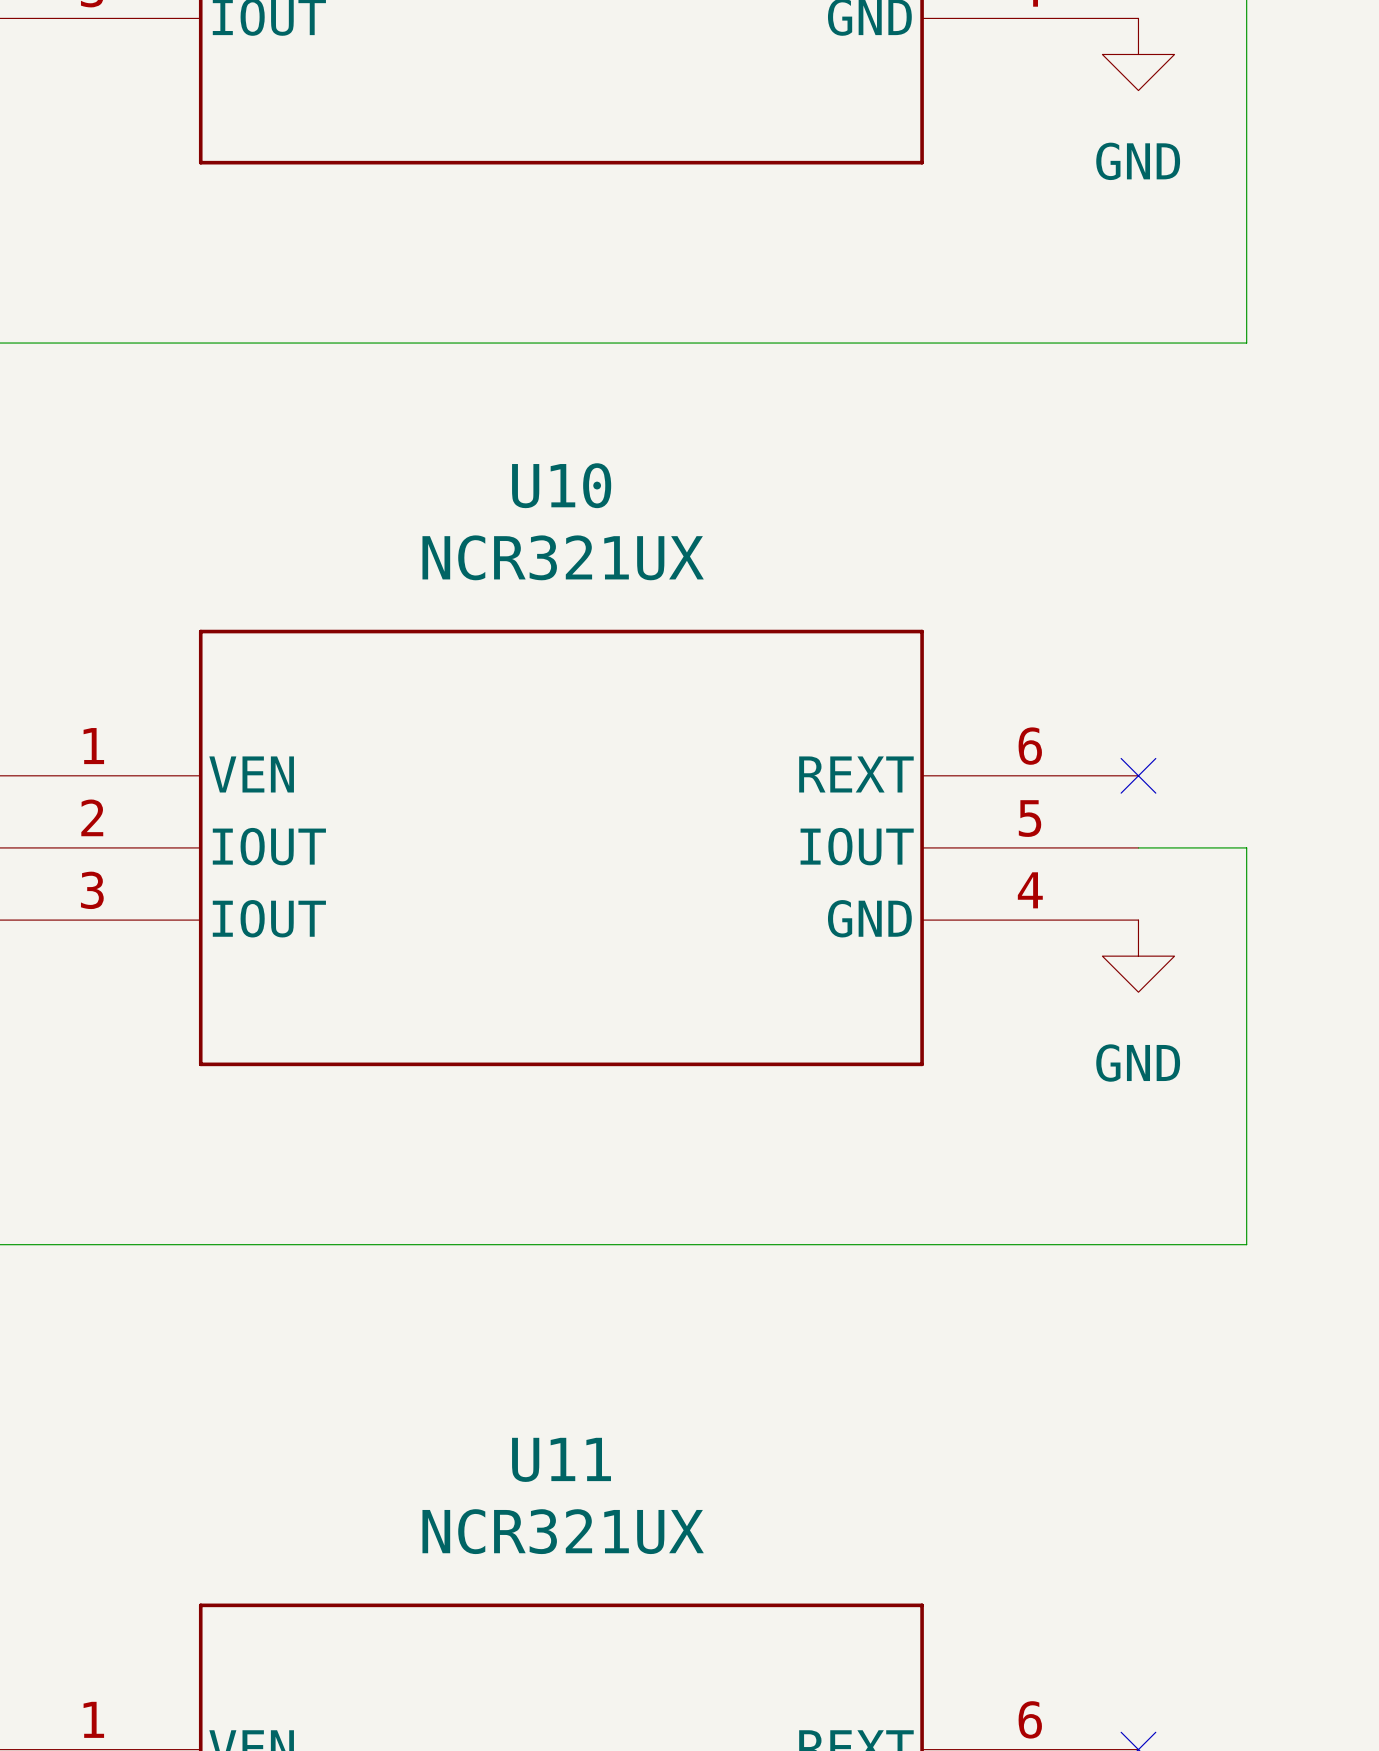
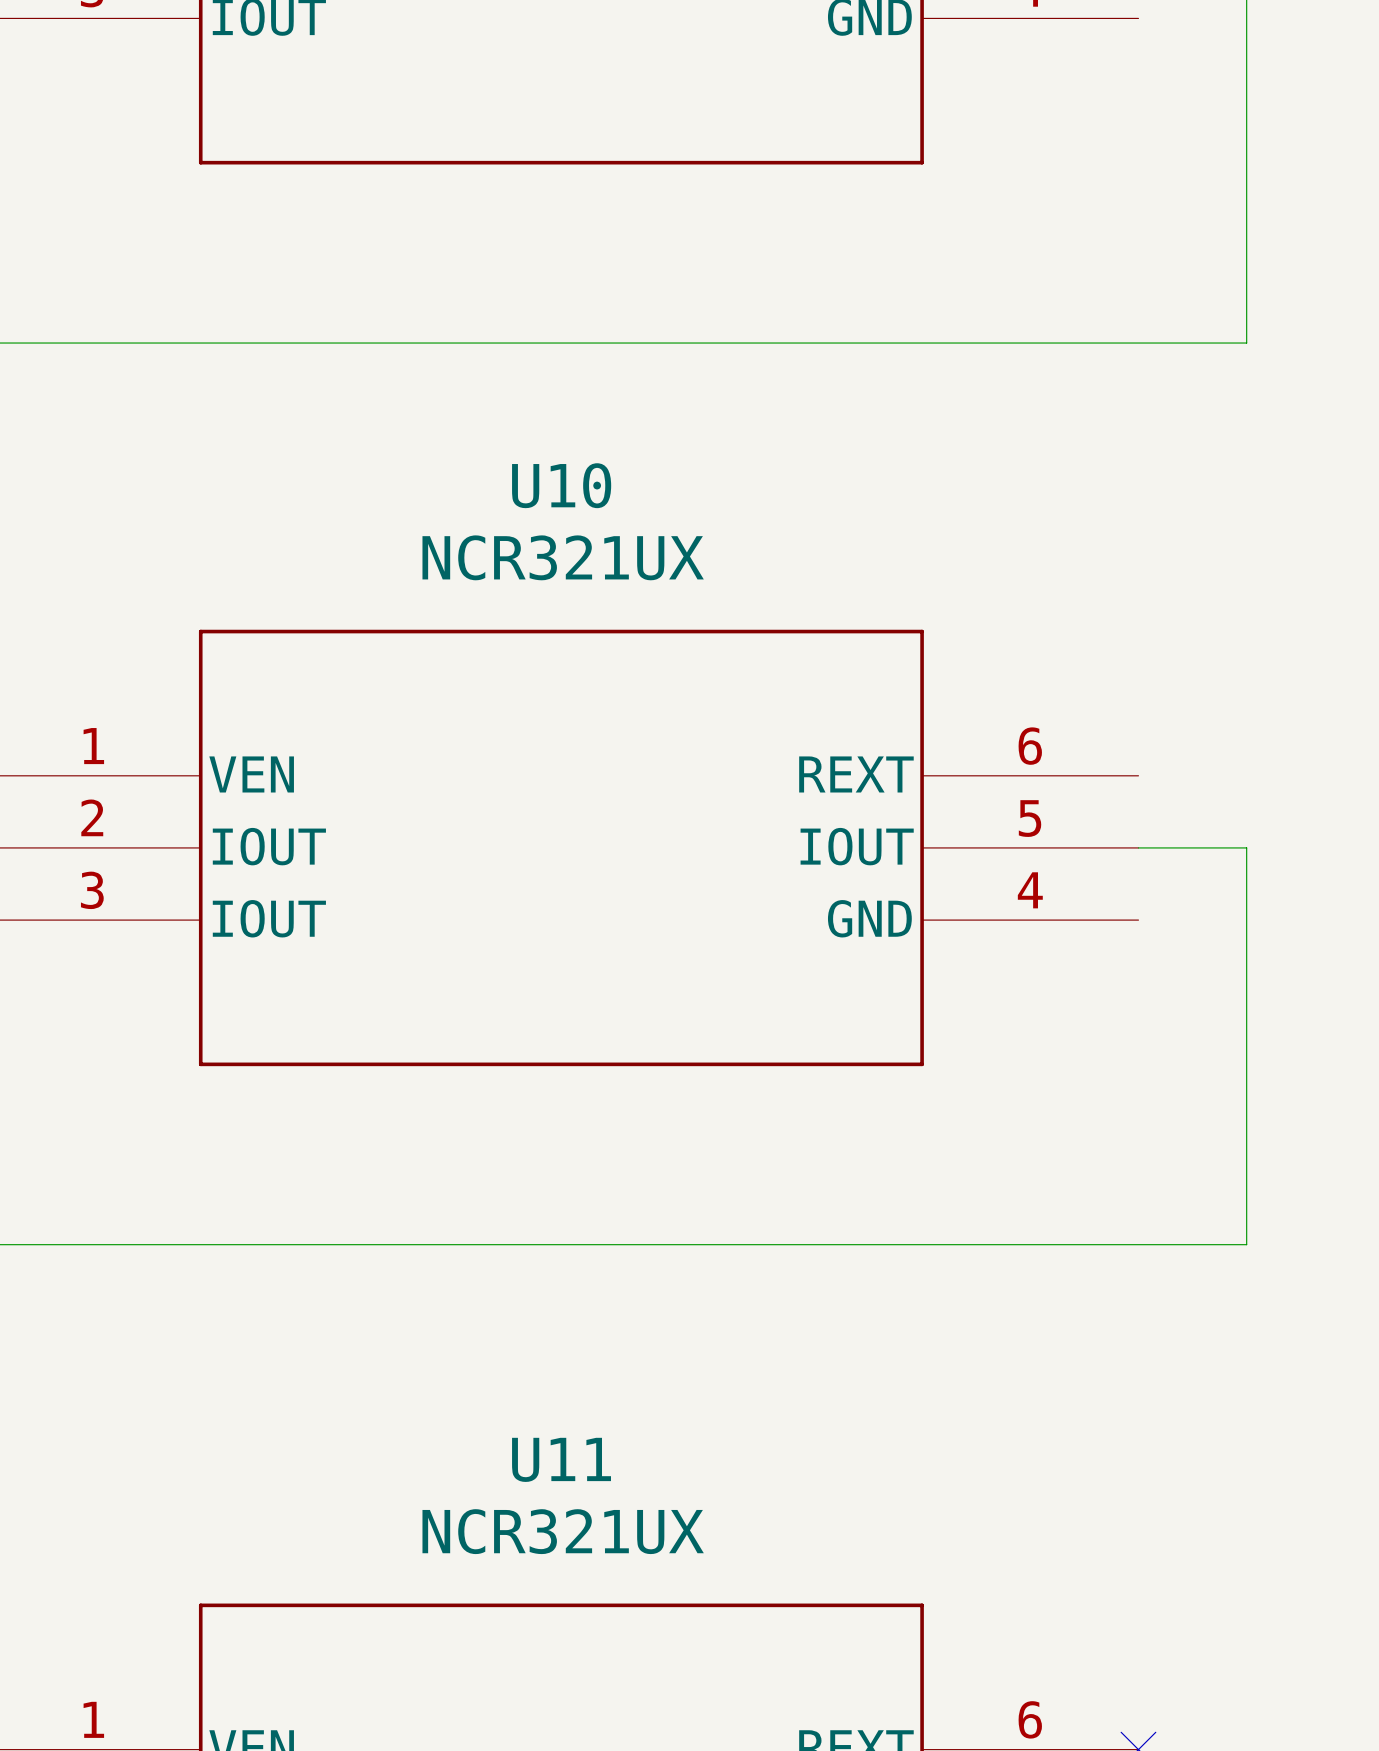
power symbol: GND (1138, 54) -> none
no-connect mark: (1138, 775) -> none
power symbol: GND (1138, 956) -> none

